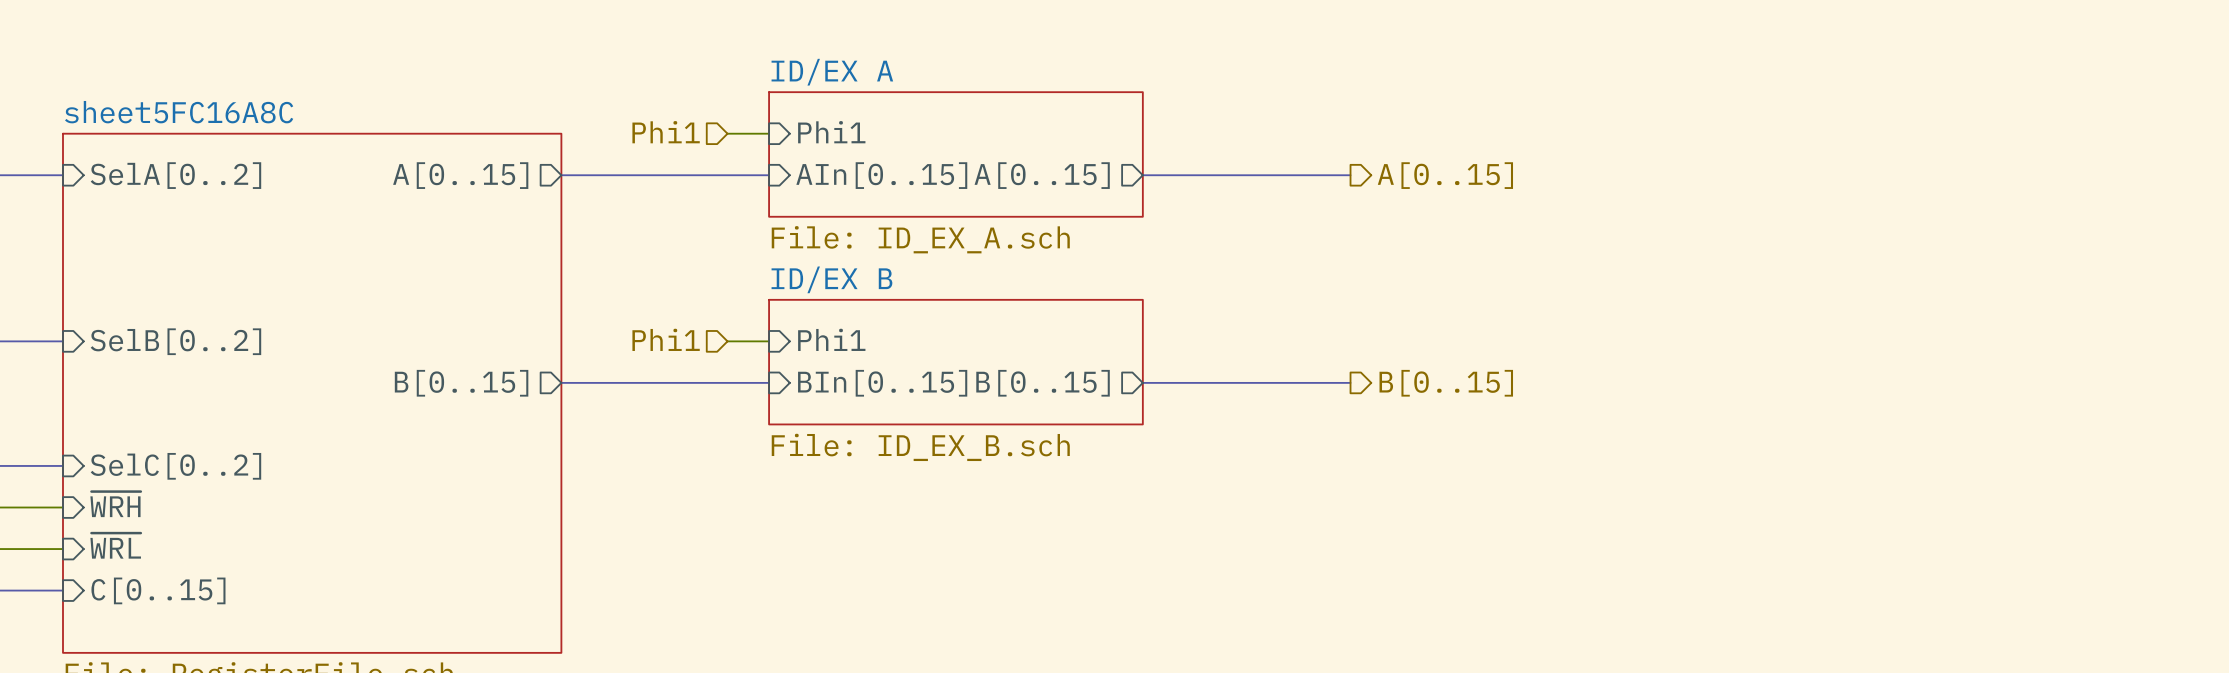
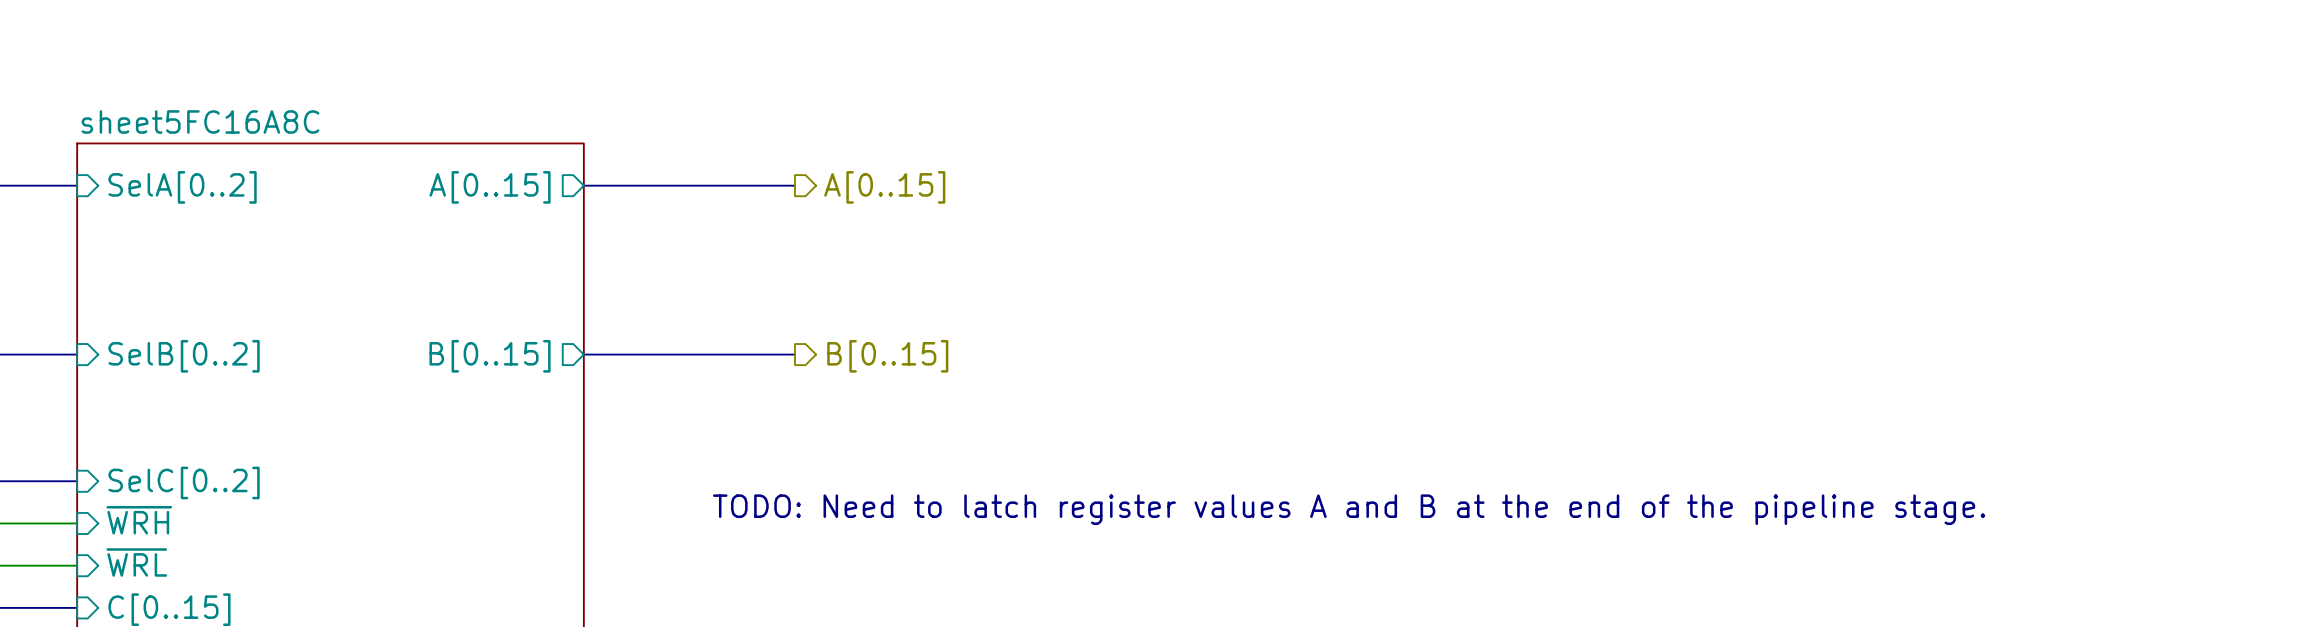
hierarchical label: Phi1 (666, 132) -> none
sheet pin: Phi1 (831, 132) -> none
wire: (727, 133) (769, 133) -> none
sheet ID/EX A: File: ID_EX_A.sch (955, 154) -> none
hierarchical label: none -> A[0..15] (884, 187)
sheet pin: AIn[0..15] (881, 175) -> none
sheet pin: A[0..15] (1042, 175) -> none
bus: (1142, 175) (1350, 175) -> none
hierarchical label: A[0..15] (1445, 175) -> none
hierarchical label: Phi1 (666, 339) -> none
sheet pin: Phi1 (831, 339) -> none
hierarchical label: none -> B[0..15] (887, 356)
sheet ID/EX B: File: ID_EX_B.sch (955, 362) -> none
bus: (561, 382) (769, 382) -> (583, 354) (794, 354)
bus: (1142, 382) (1350, 382) -> none
sheet pin position: B[0..15] (461, 383) -> B[0..15] (490, 356)
sheet pin: BIn[0..15] (882, 383) -> none
sheet pin: B[0..15] (1043, 383) -> none
hierarchical label: B[0..15] (1446, 383) -> none
text: none -> TODO: Need to latch register values A and B at the end of the pipeline stage. (1349, 509)

